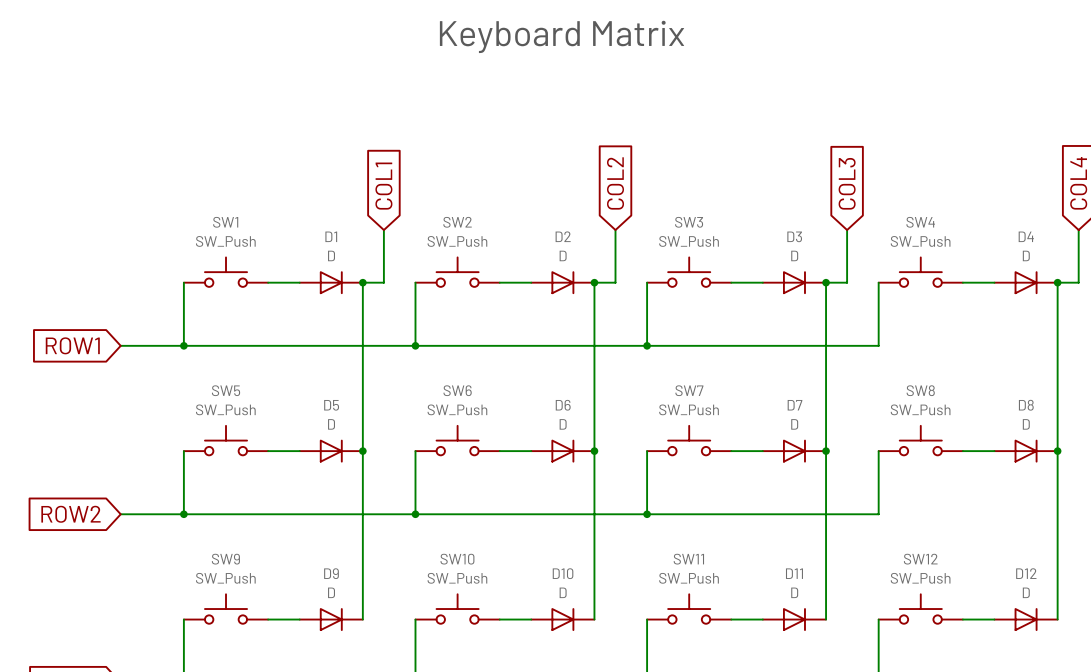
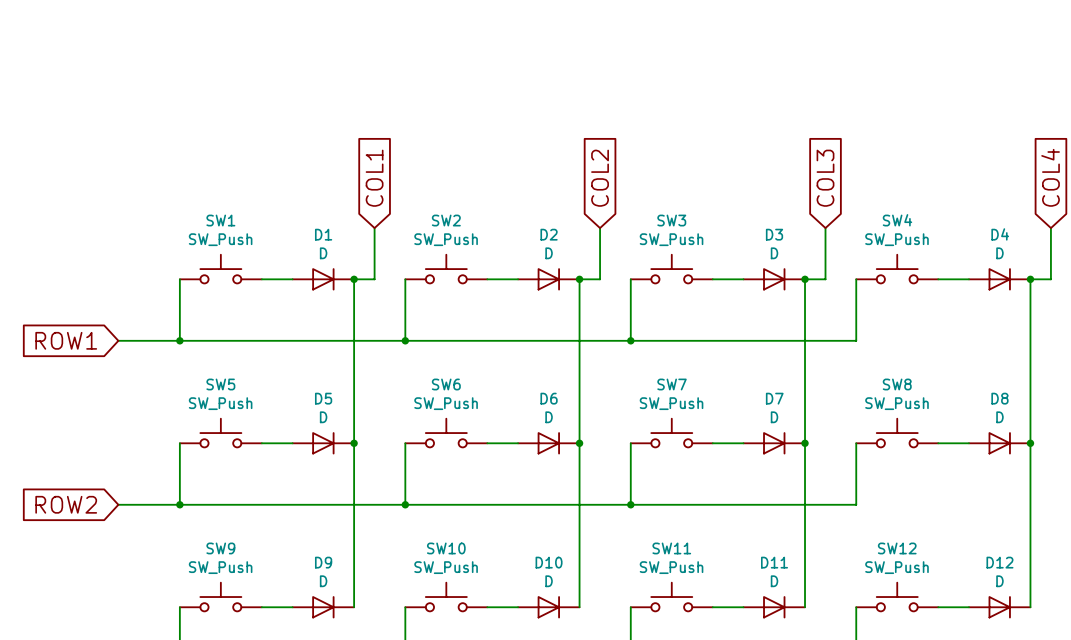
text: Keyboard Matrix (562, 36) -> none

